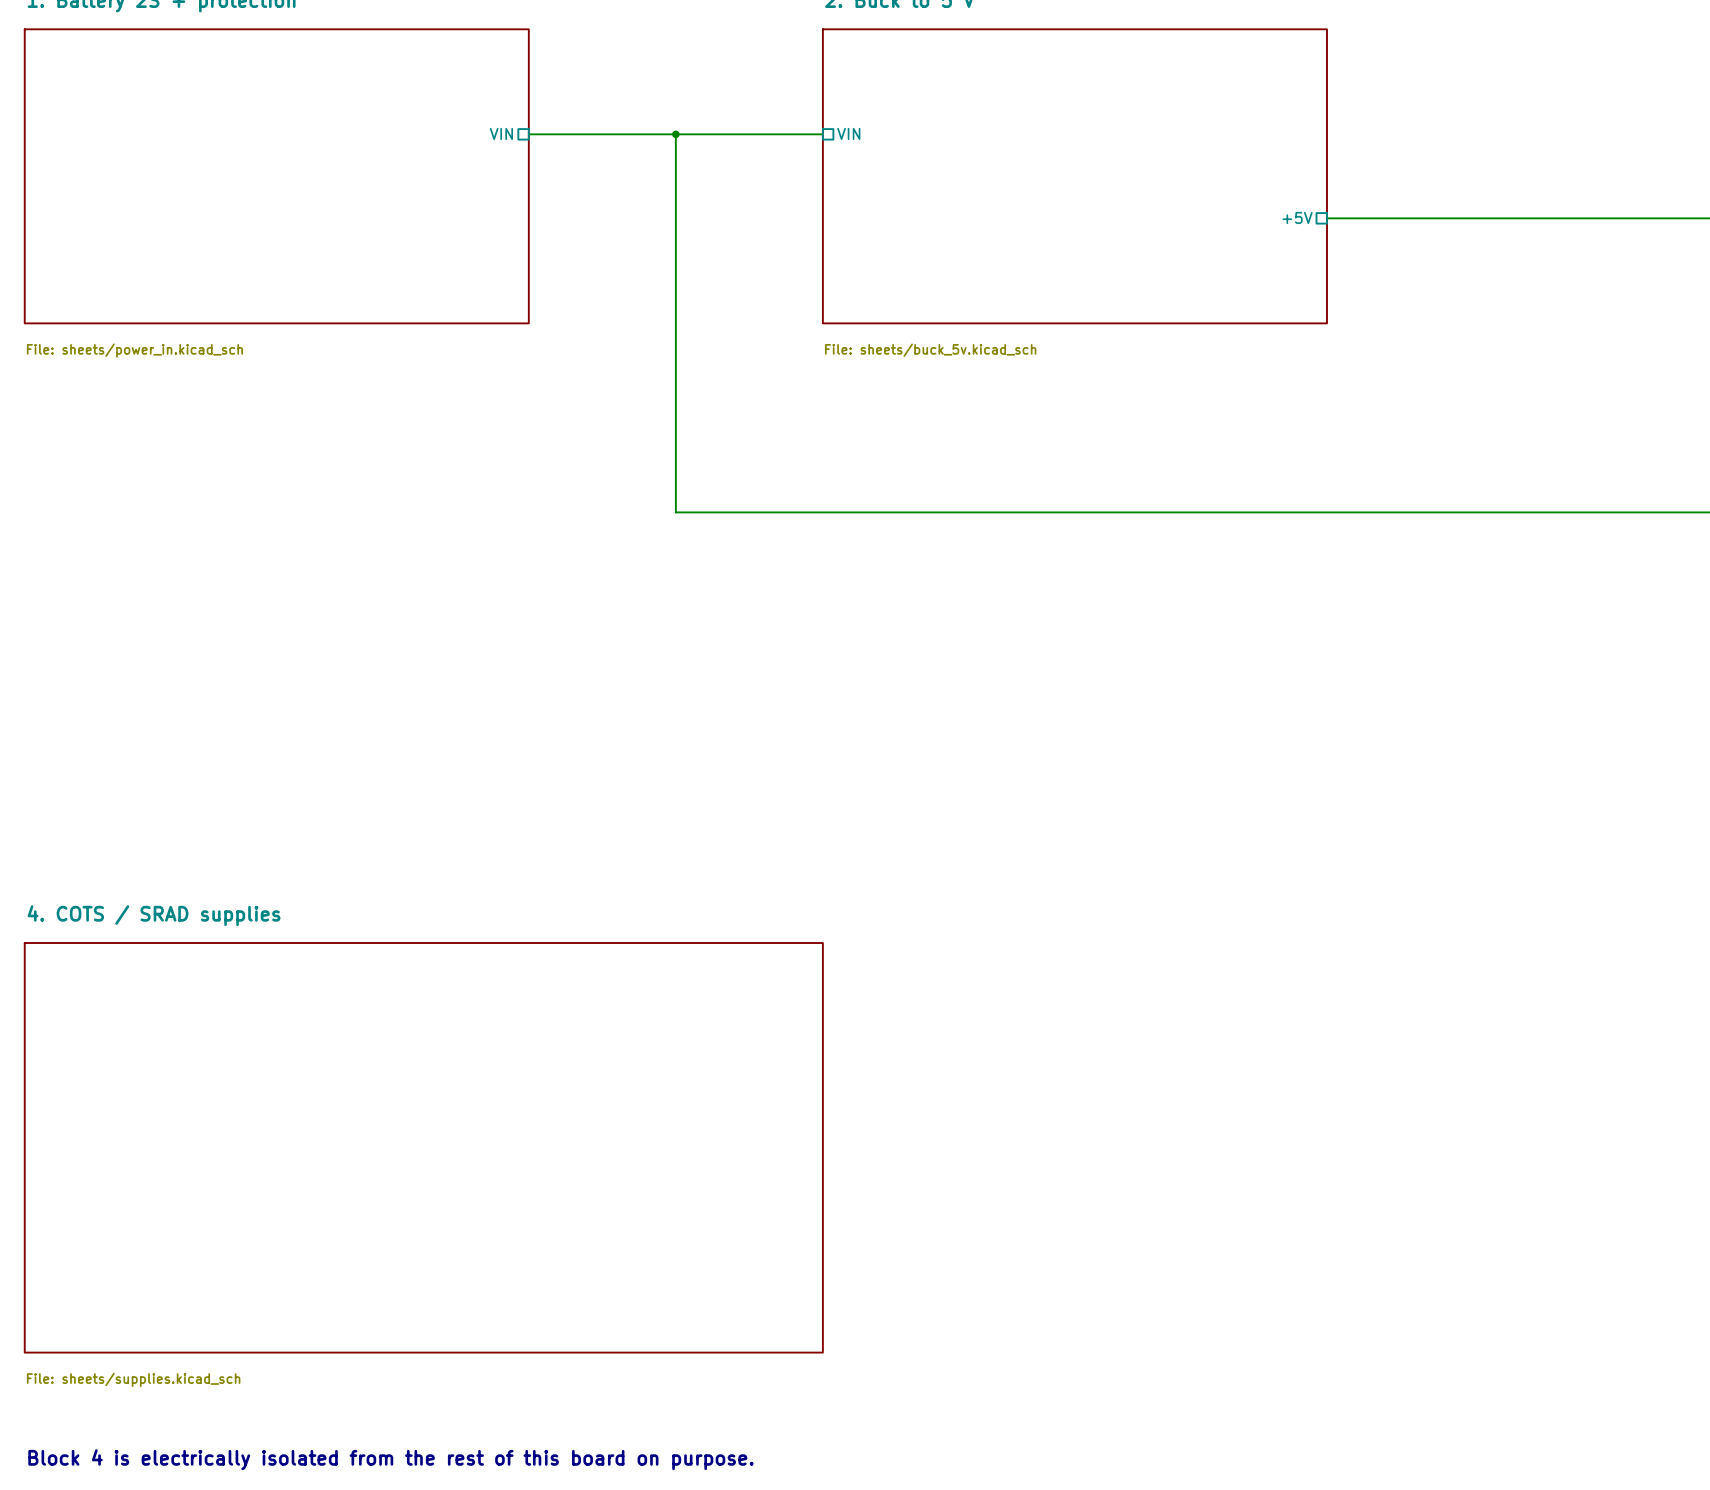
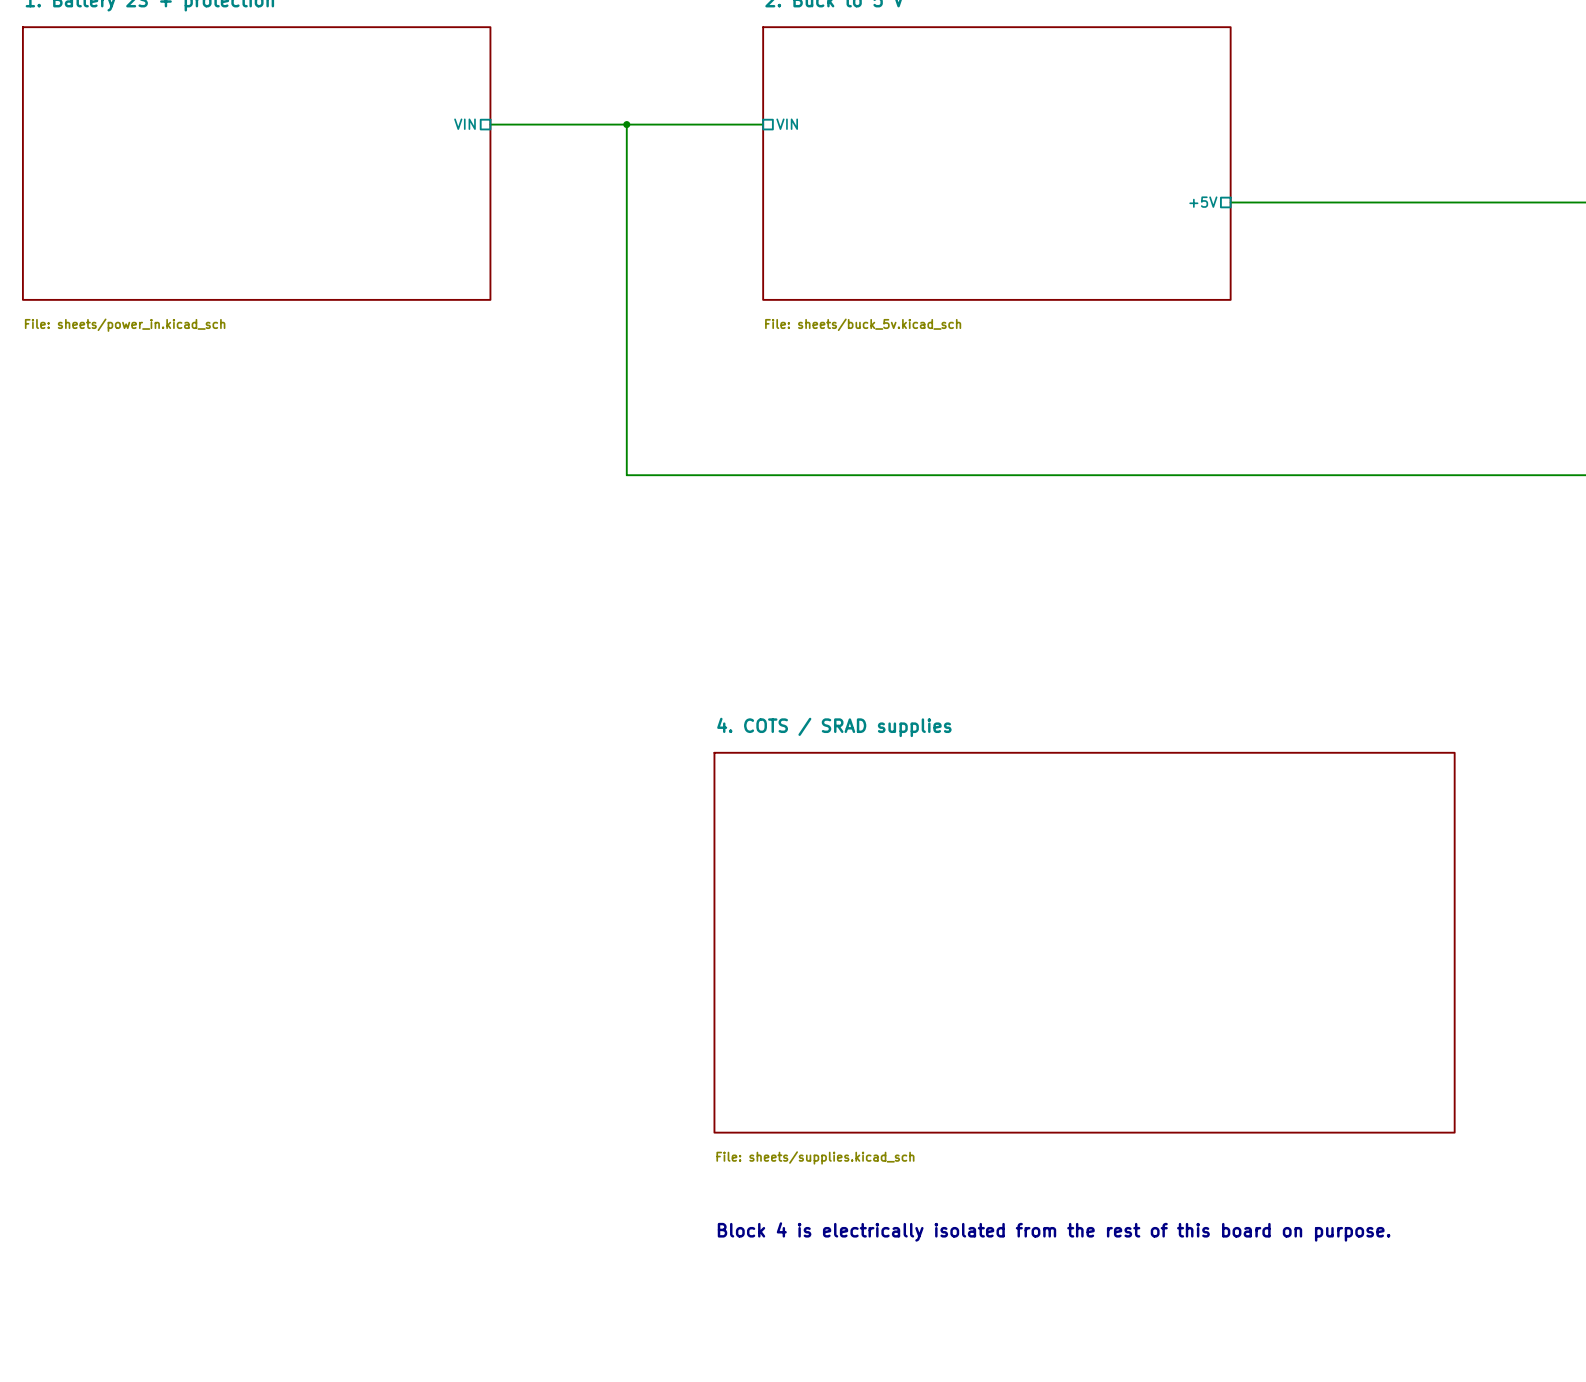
sheet 4. COTS / SRAD supplies position: (423, 1147) -> (1084, 942)
text: none -> Block 4 is electrically isolated from the rest of this board on purpose. (1054, 1231)
text: Block 4 is electrically isolated from the rest of this board on purpose. (390, 1459) -> none

